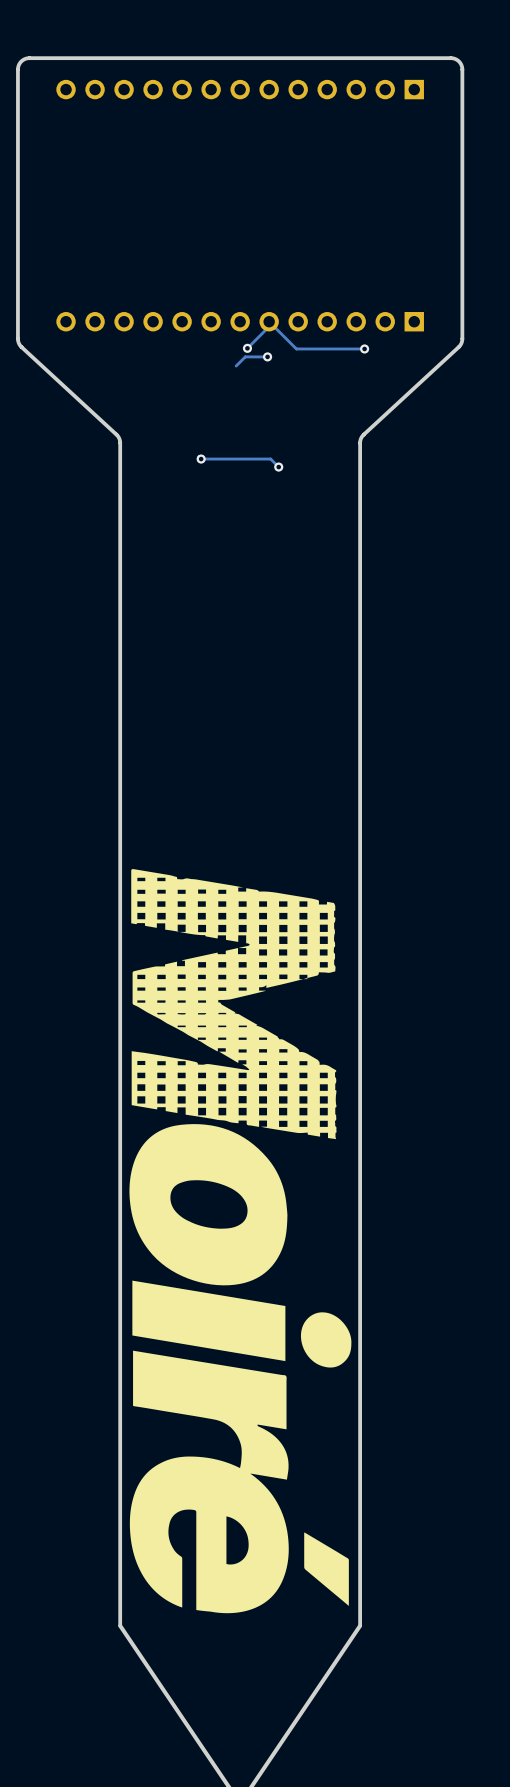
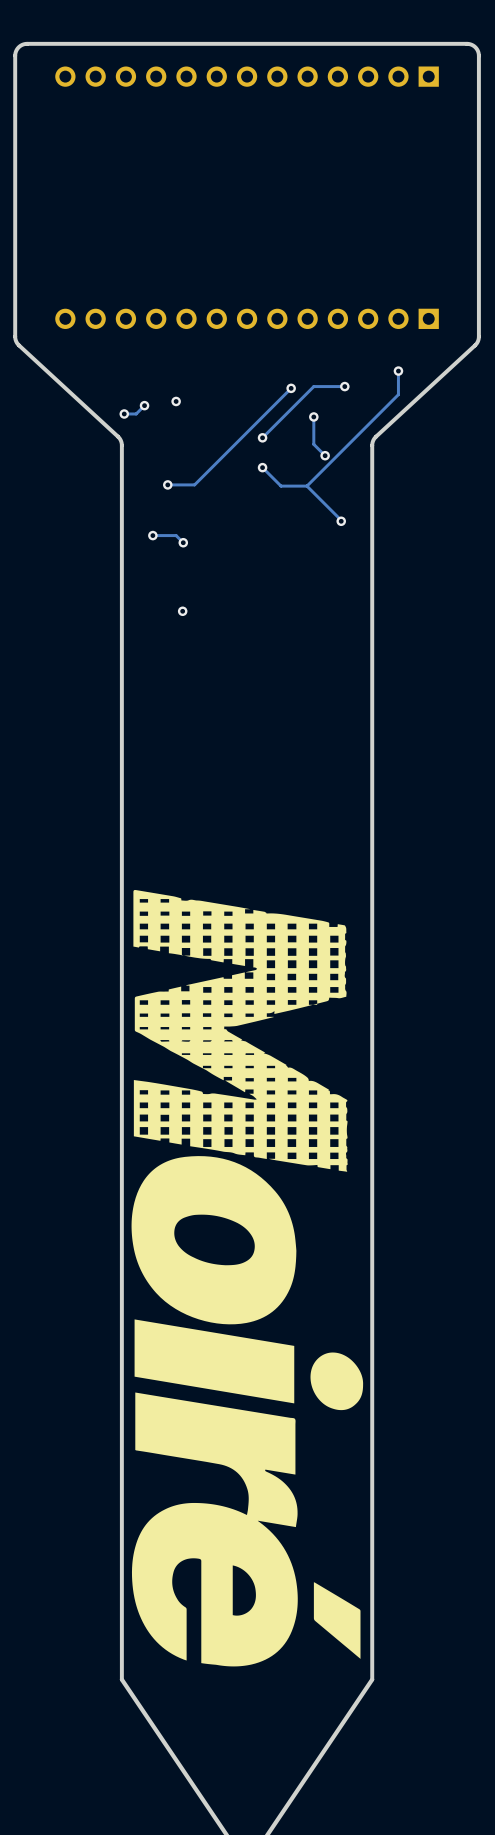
track: (269, 321) (296, 348) (364, 348) -> none
track: (265, 325) (267, 327) (247, 348) -> none
via: (247, 348) -> none
via: (364, 348) -> none
track: (267, 356) (245, 356) (236, 366) -> none
via: (267, 356) -> none
track: none -> (398, 371) (398, 394) (306, 486)
via: none -> (398, 371)
track: none -> (344, 386) (313, 386) (262, 437)
via: none -> (344, 386)
track: none -> (291, 388) (194, 484) (167, 484)
via: none -> (291, 388)
via: none -> (176, 401)
track: none -> (144, 405) (136, 413) (124, 413)
via: none -> (144, 405)
via: none -> (124, 413)
track: none -> (313, 416) (313, 444) (325, 455)
via: none -> (313, 416)
via: none -> (262, 437)
via: none -> (325, 455)
track: (198, 456) (201, 459) (270, 459) (279, 466) -> none
via: (201, 459) -> none
track: none -> (262, 467) (281, 486) (306, 486)
via: none -> (262, 467)
via: (278, 467) -> none
via: none -> (167, 484)
track: none -> (306, 486) (341, 521)
via: none -> (341, 521)
track: none -> (152, 535) (176, 535) (183, 542)
via: none -> (152, 535)
via: none -> (183, 542)
via: none -> (182, 611)

